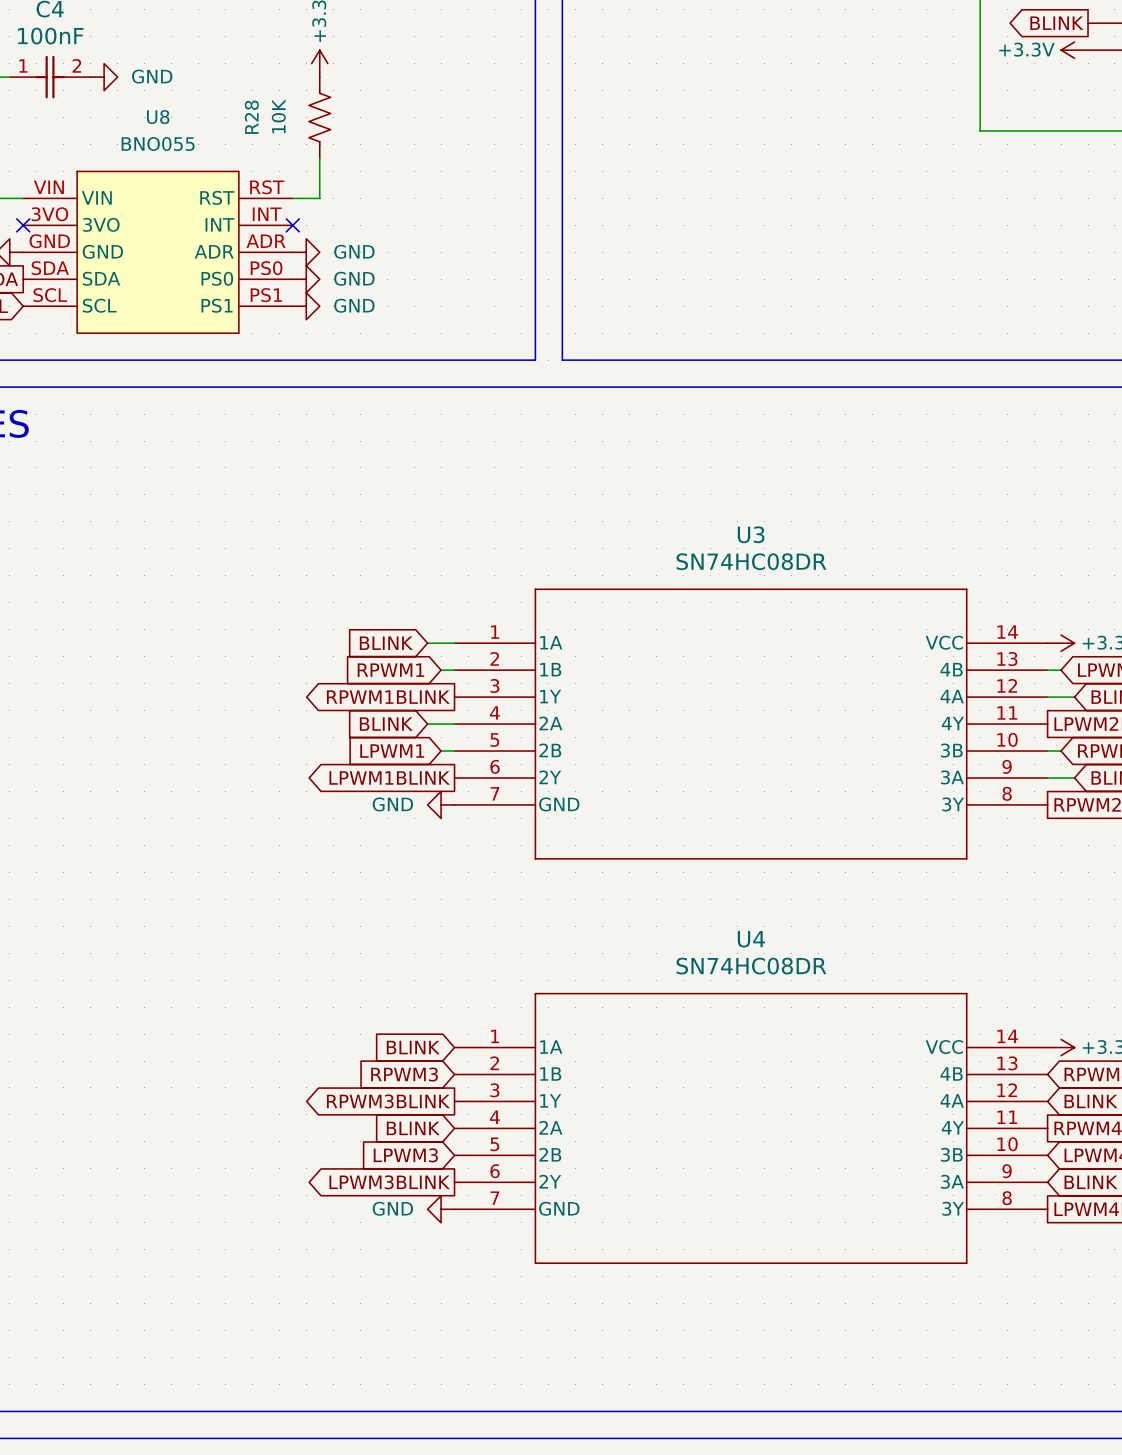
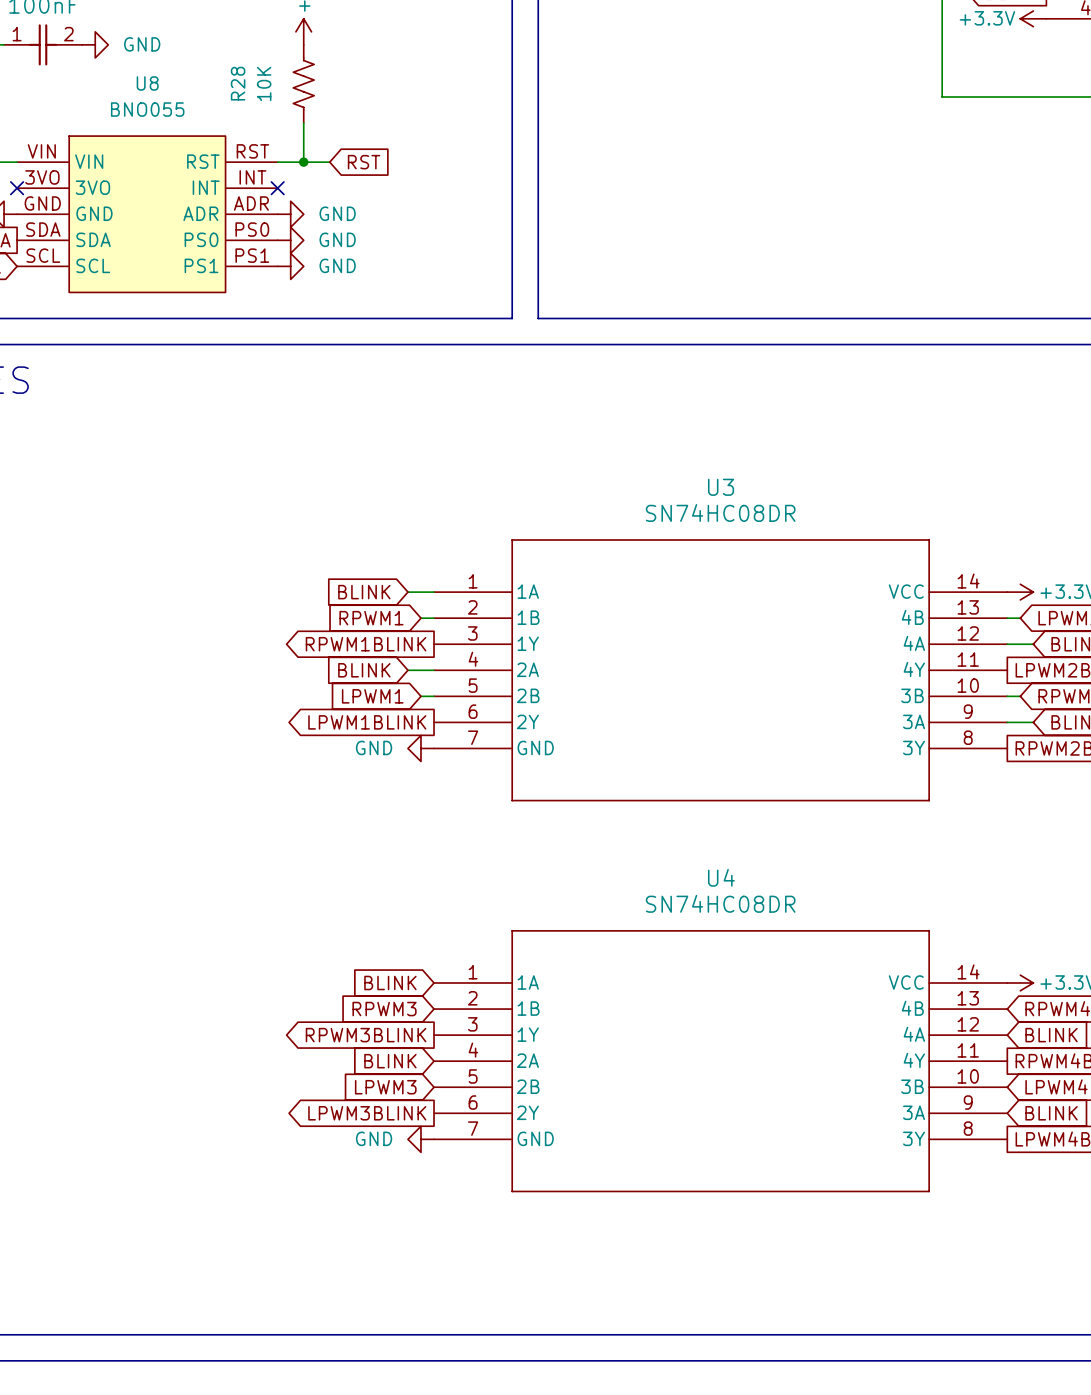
wire: none -> (303, 162) (329, 162)
junction: none -> (303, 162)
global label: none -> RST (364, 162)

